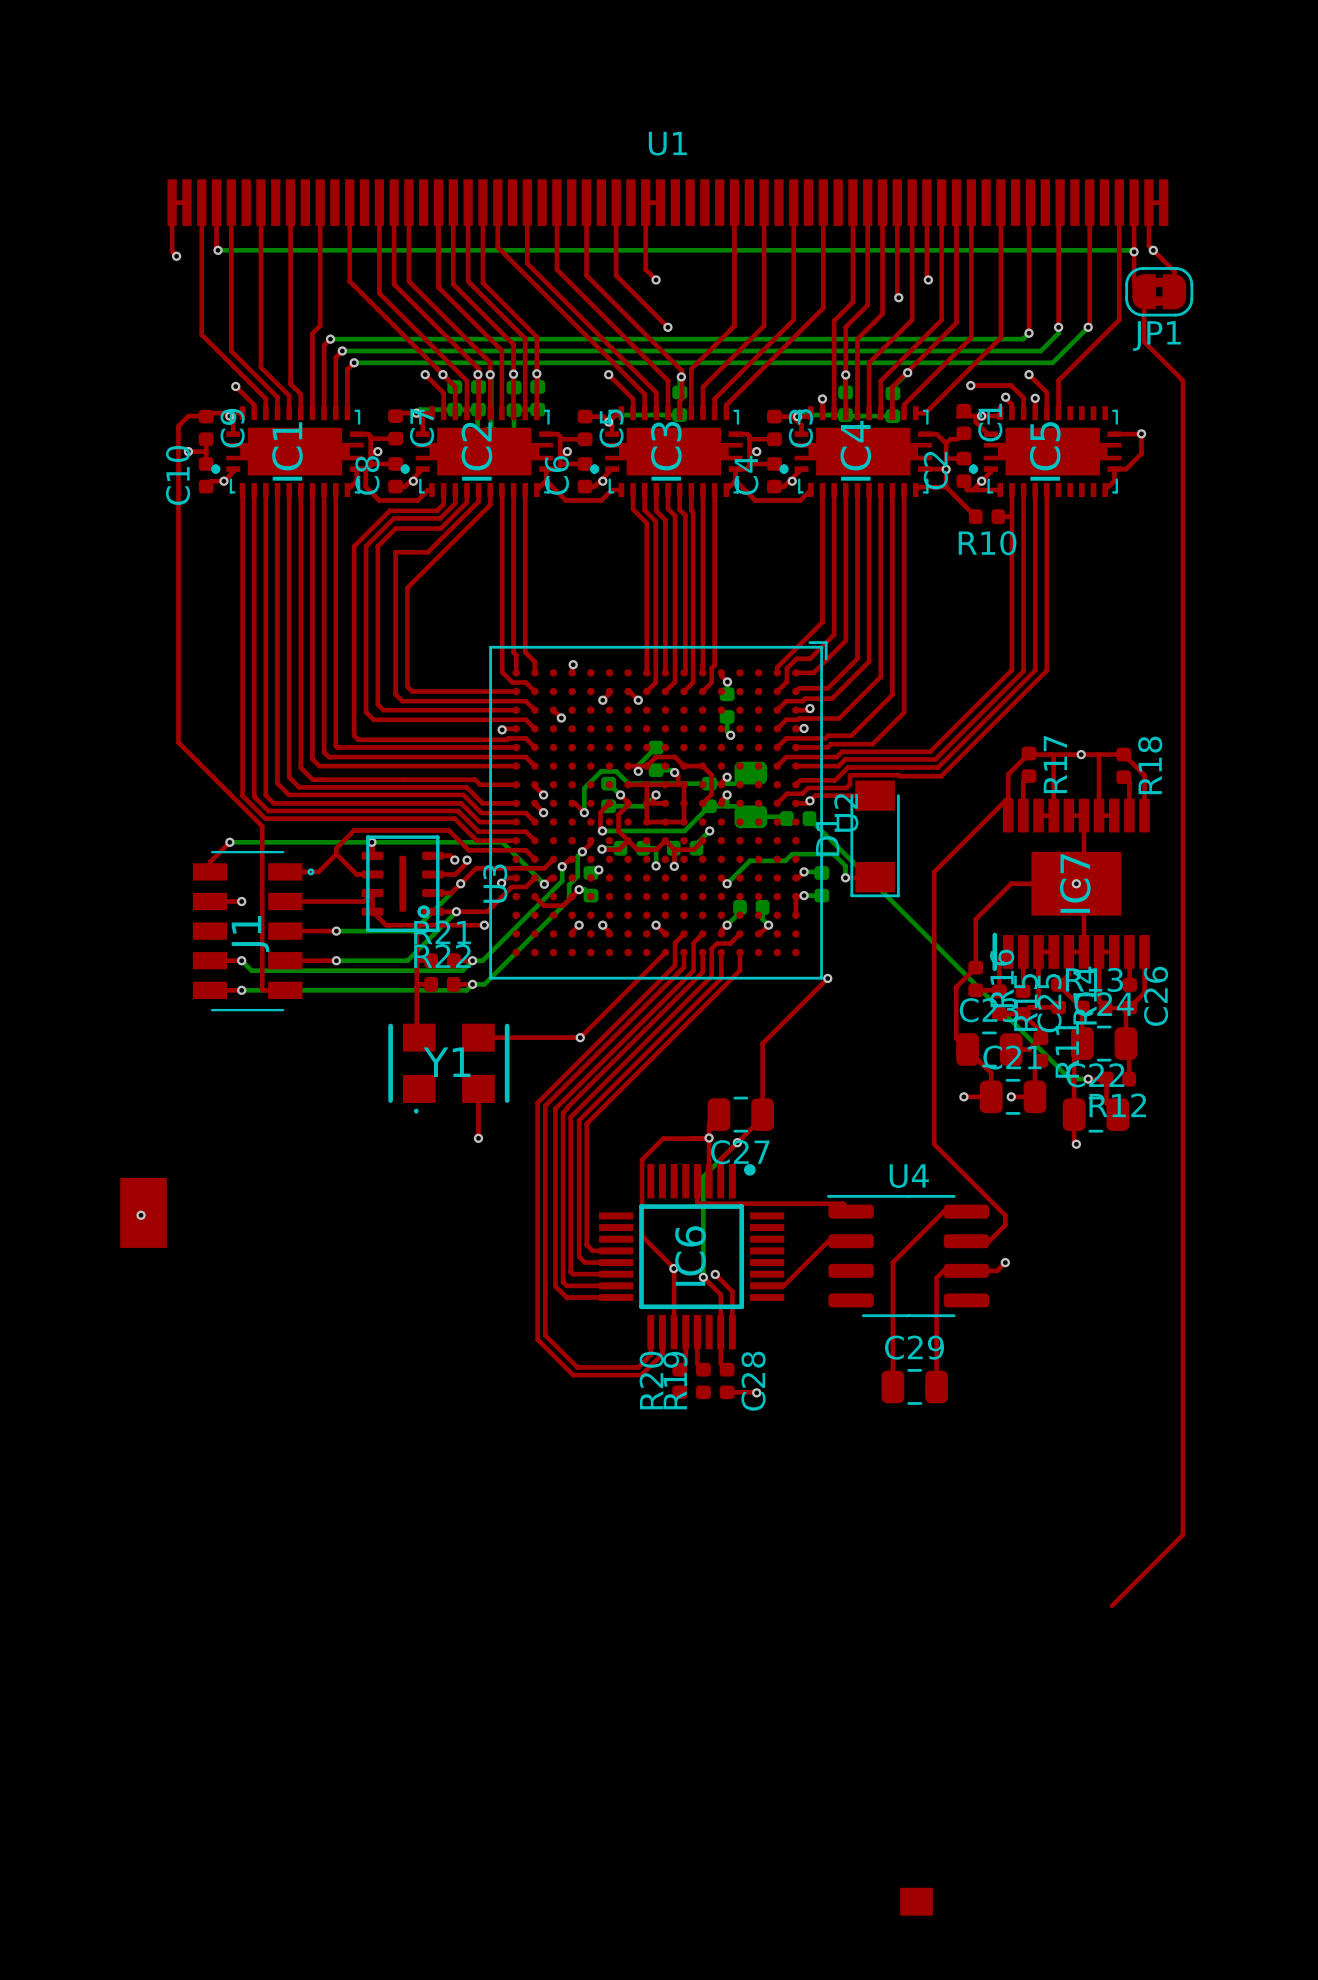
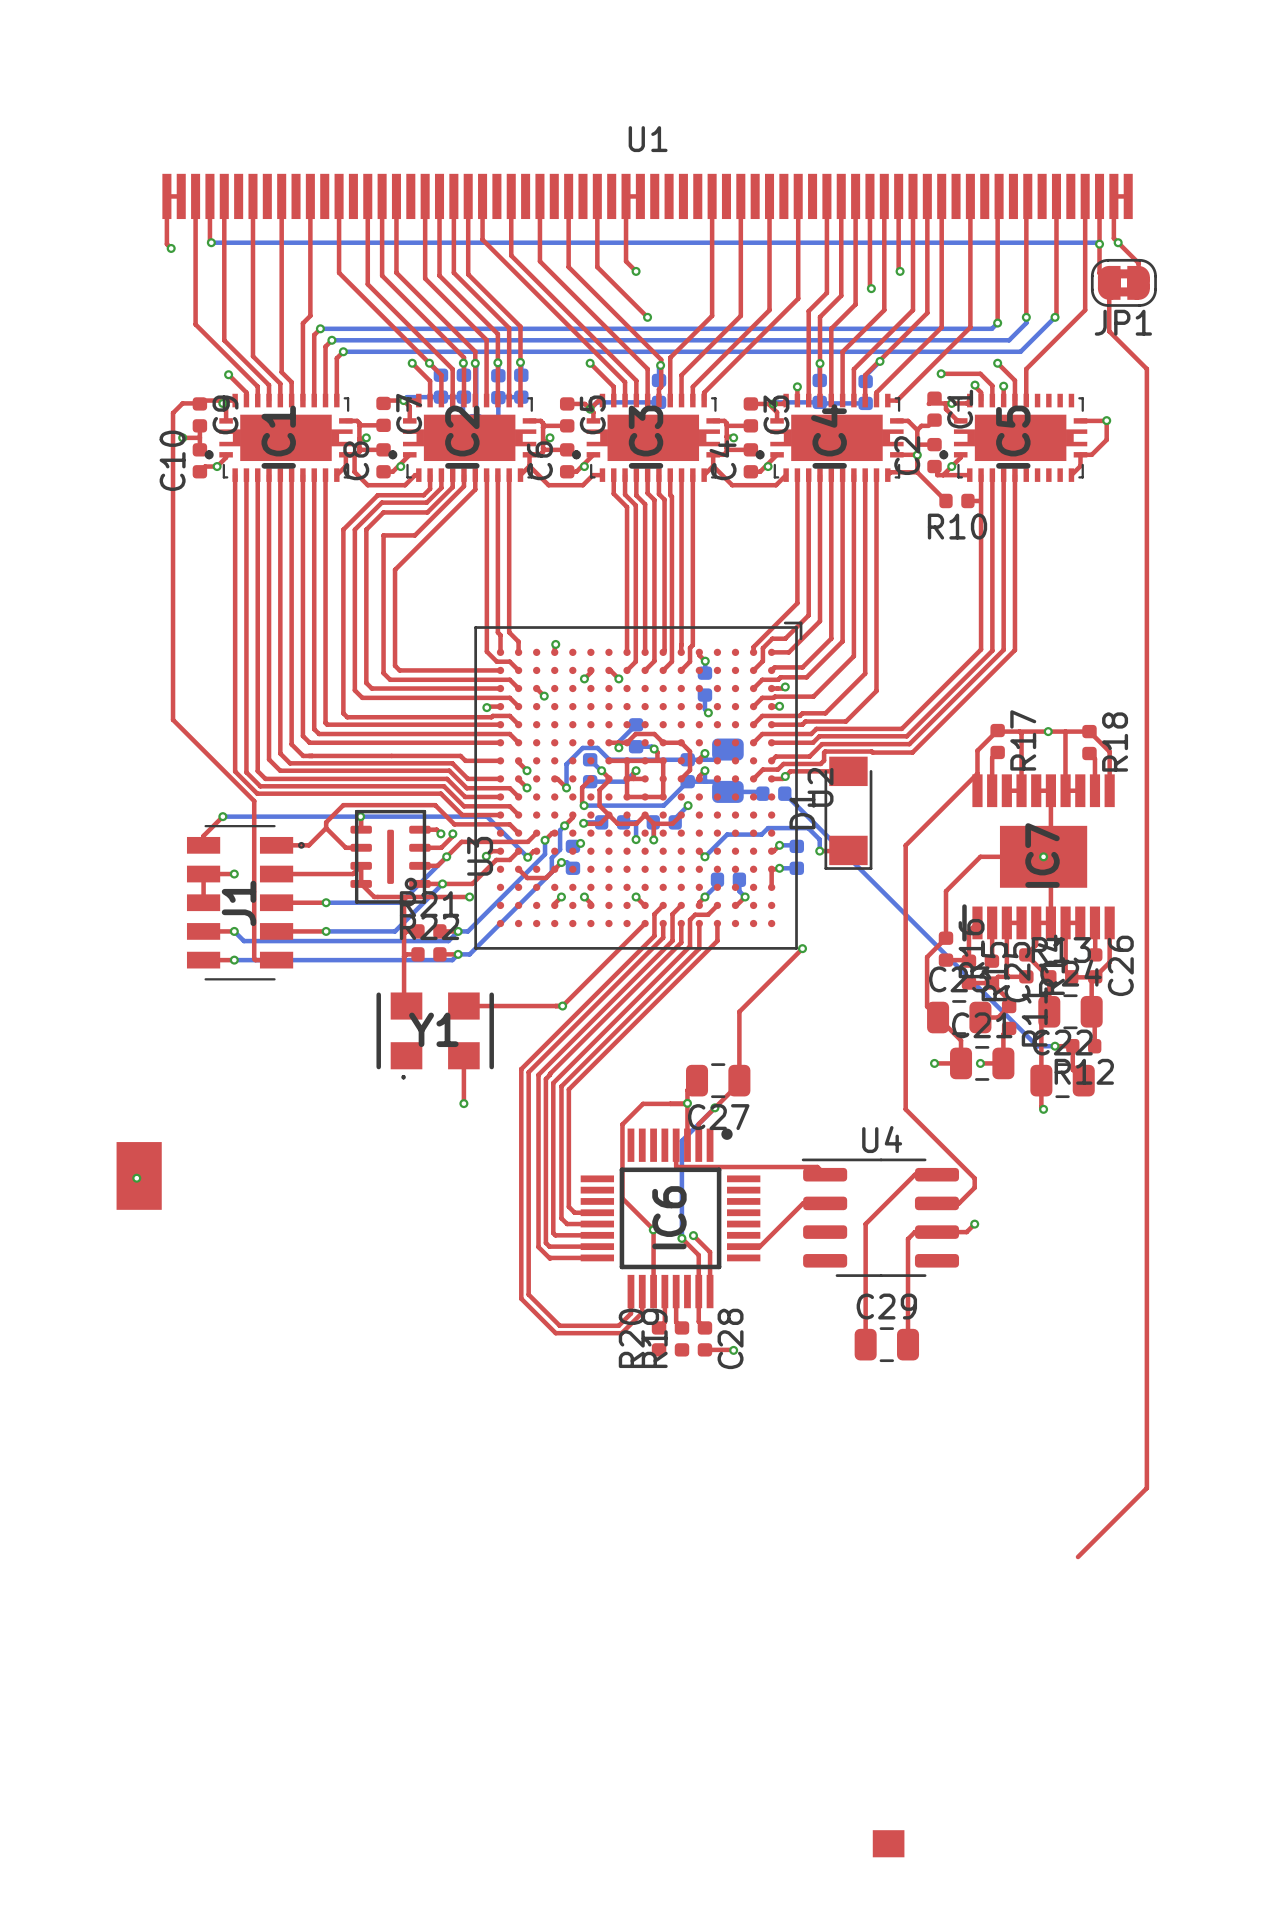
top track: none -> (203, 874) (203, 902)

